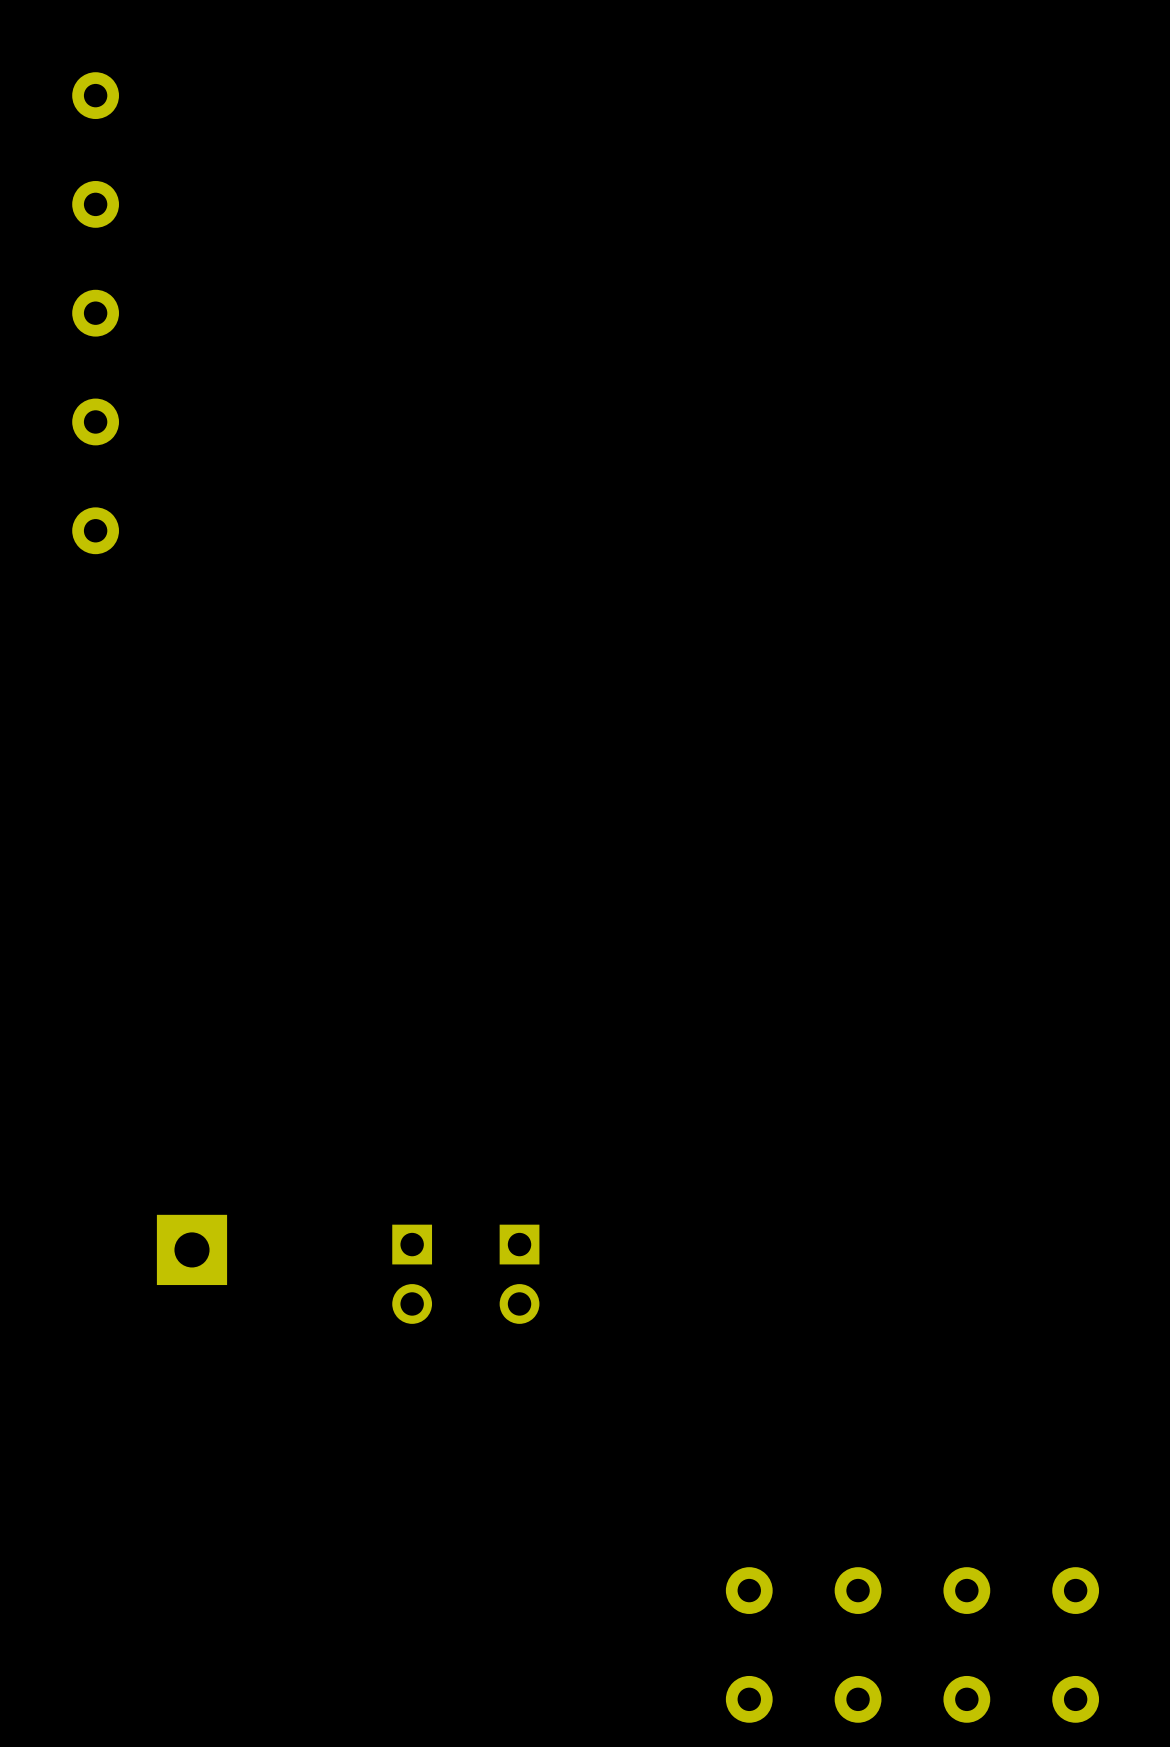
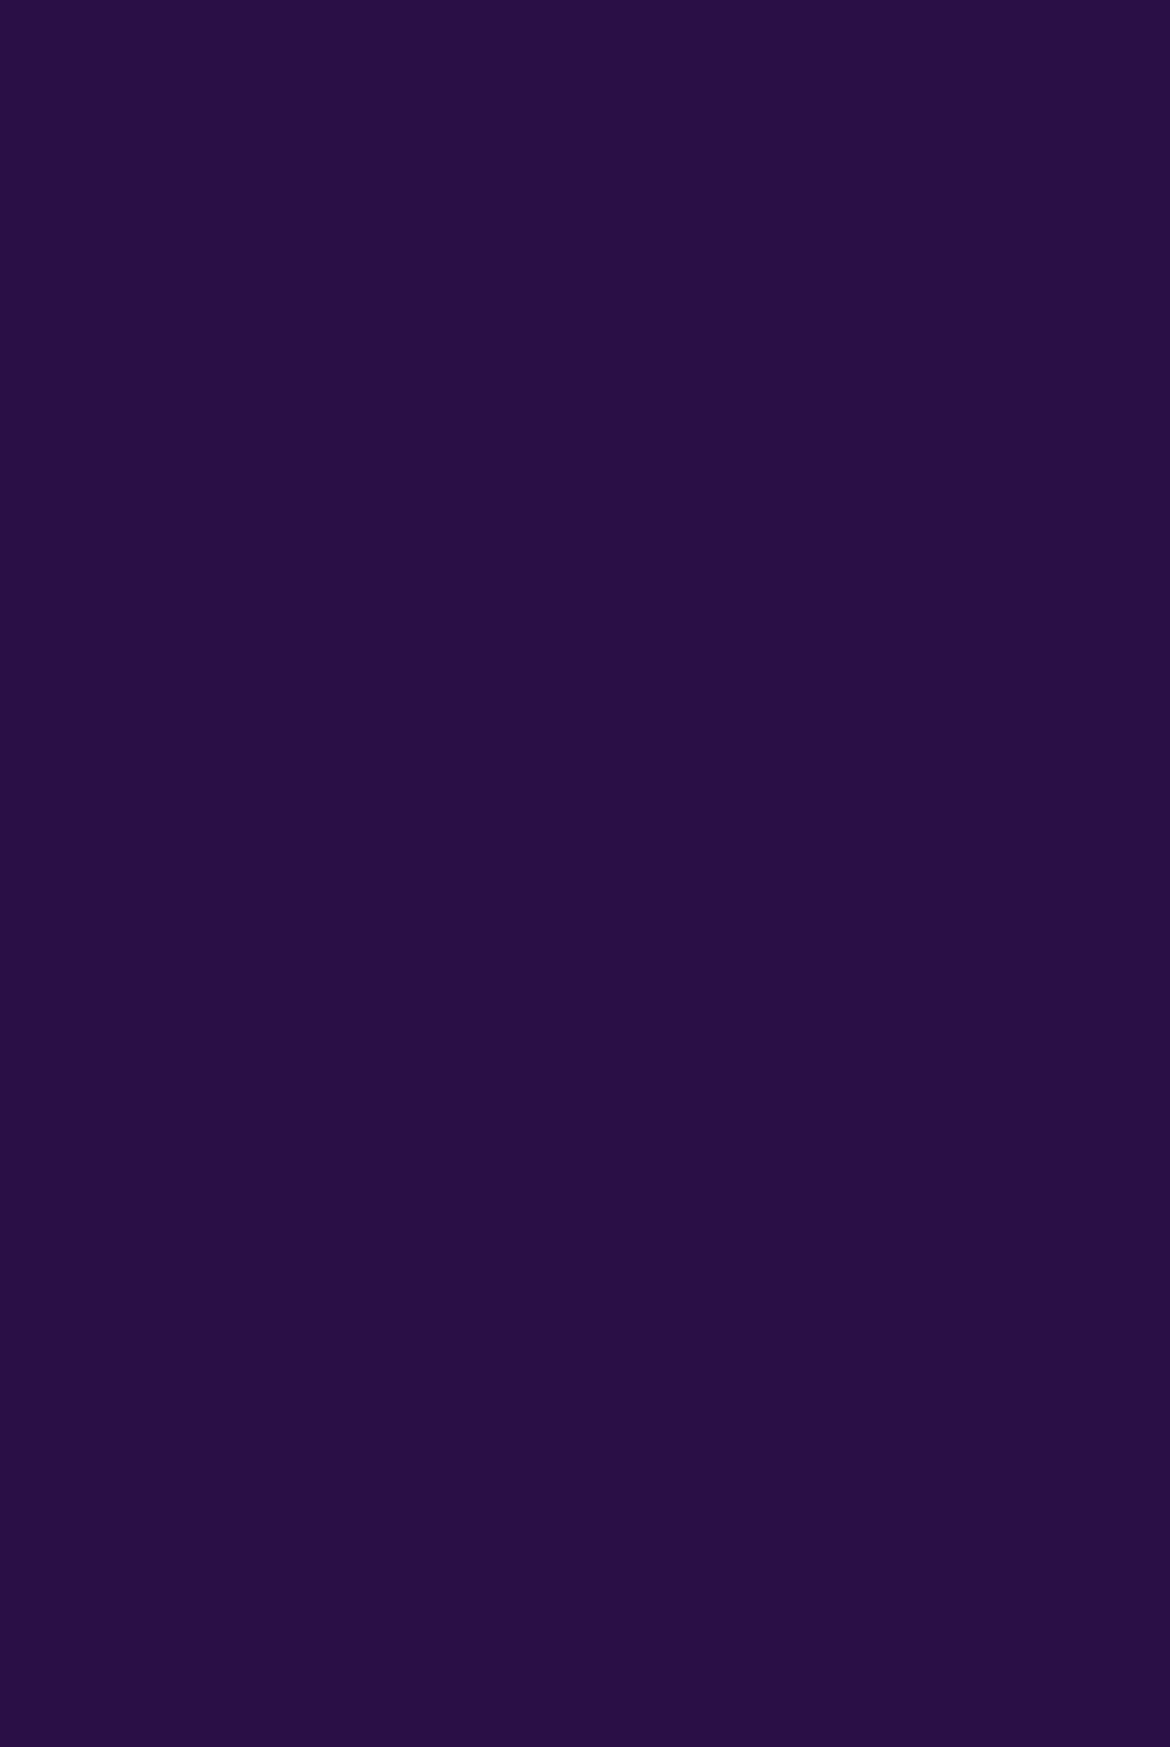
part: (95, 95) -> none
part: (95, 204) -> none
part: (95, 313) -> none
part: (95, 421) -> none
part: (95, 530) -> none
part: (191, 1249) -> none
part: (412, 1274) -> none
part: (519, 1274) -> none
part: (749, 1590) -> none
part: (858, 1590) -> none
part: (966, 1590) -> none
part: (1075, 1590) -> none
part: (749, 1699) -> none
part: (858, 1699) -> none
part: (966, 1699) -> none
part: (1075, 1699) -> none

